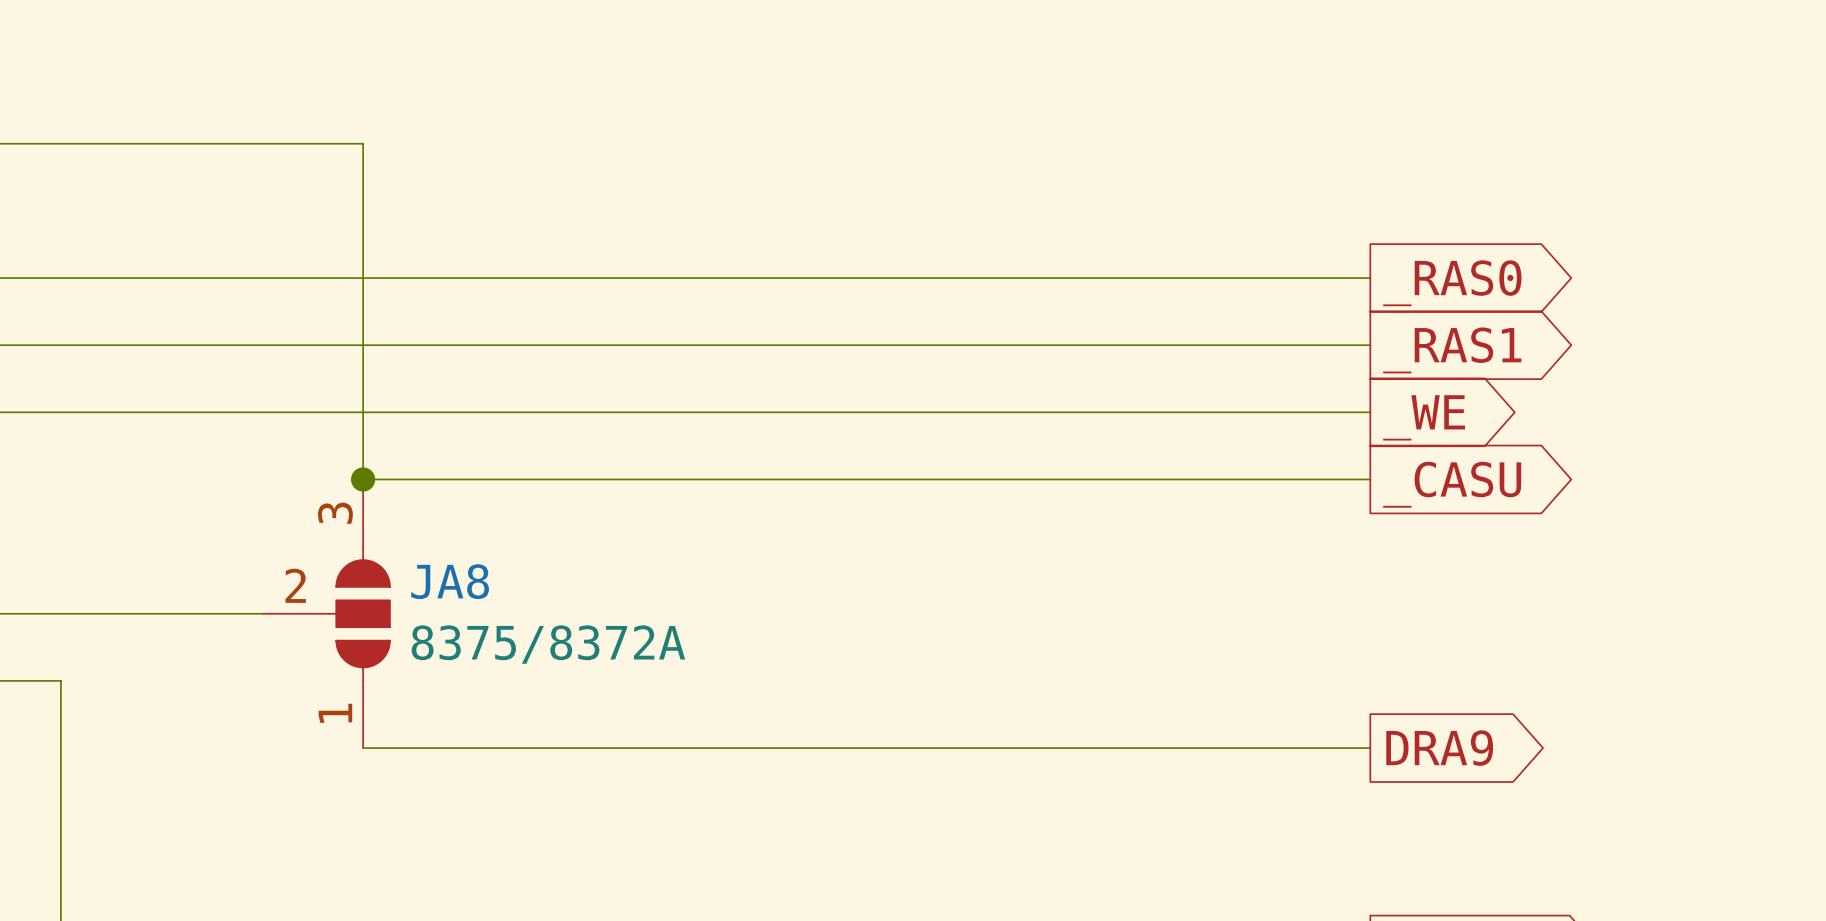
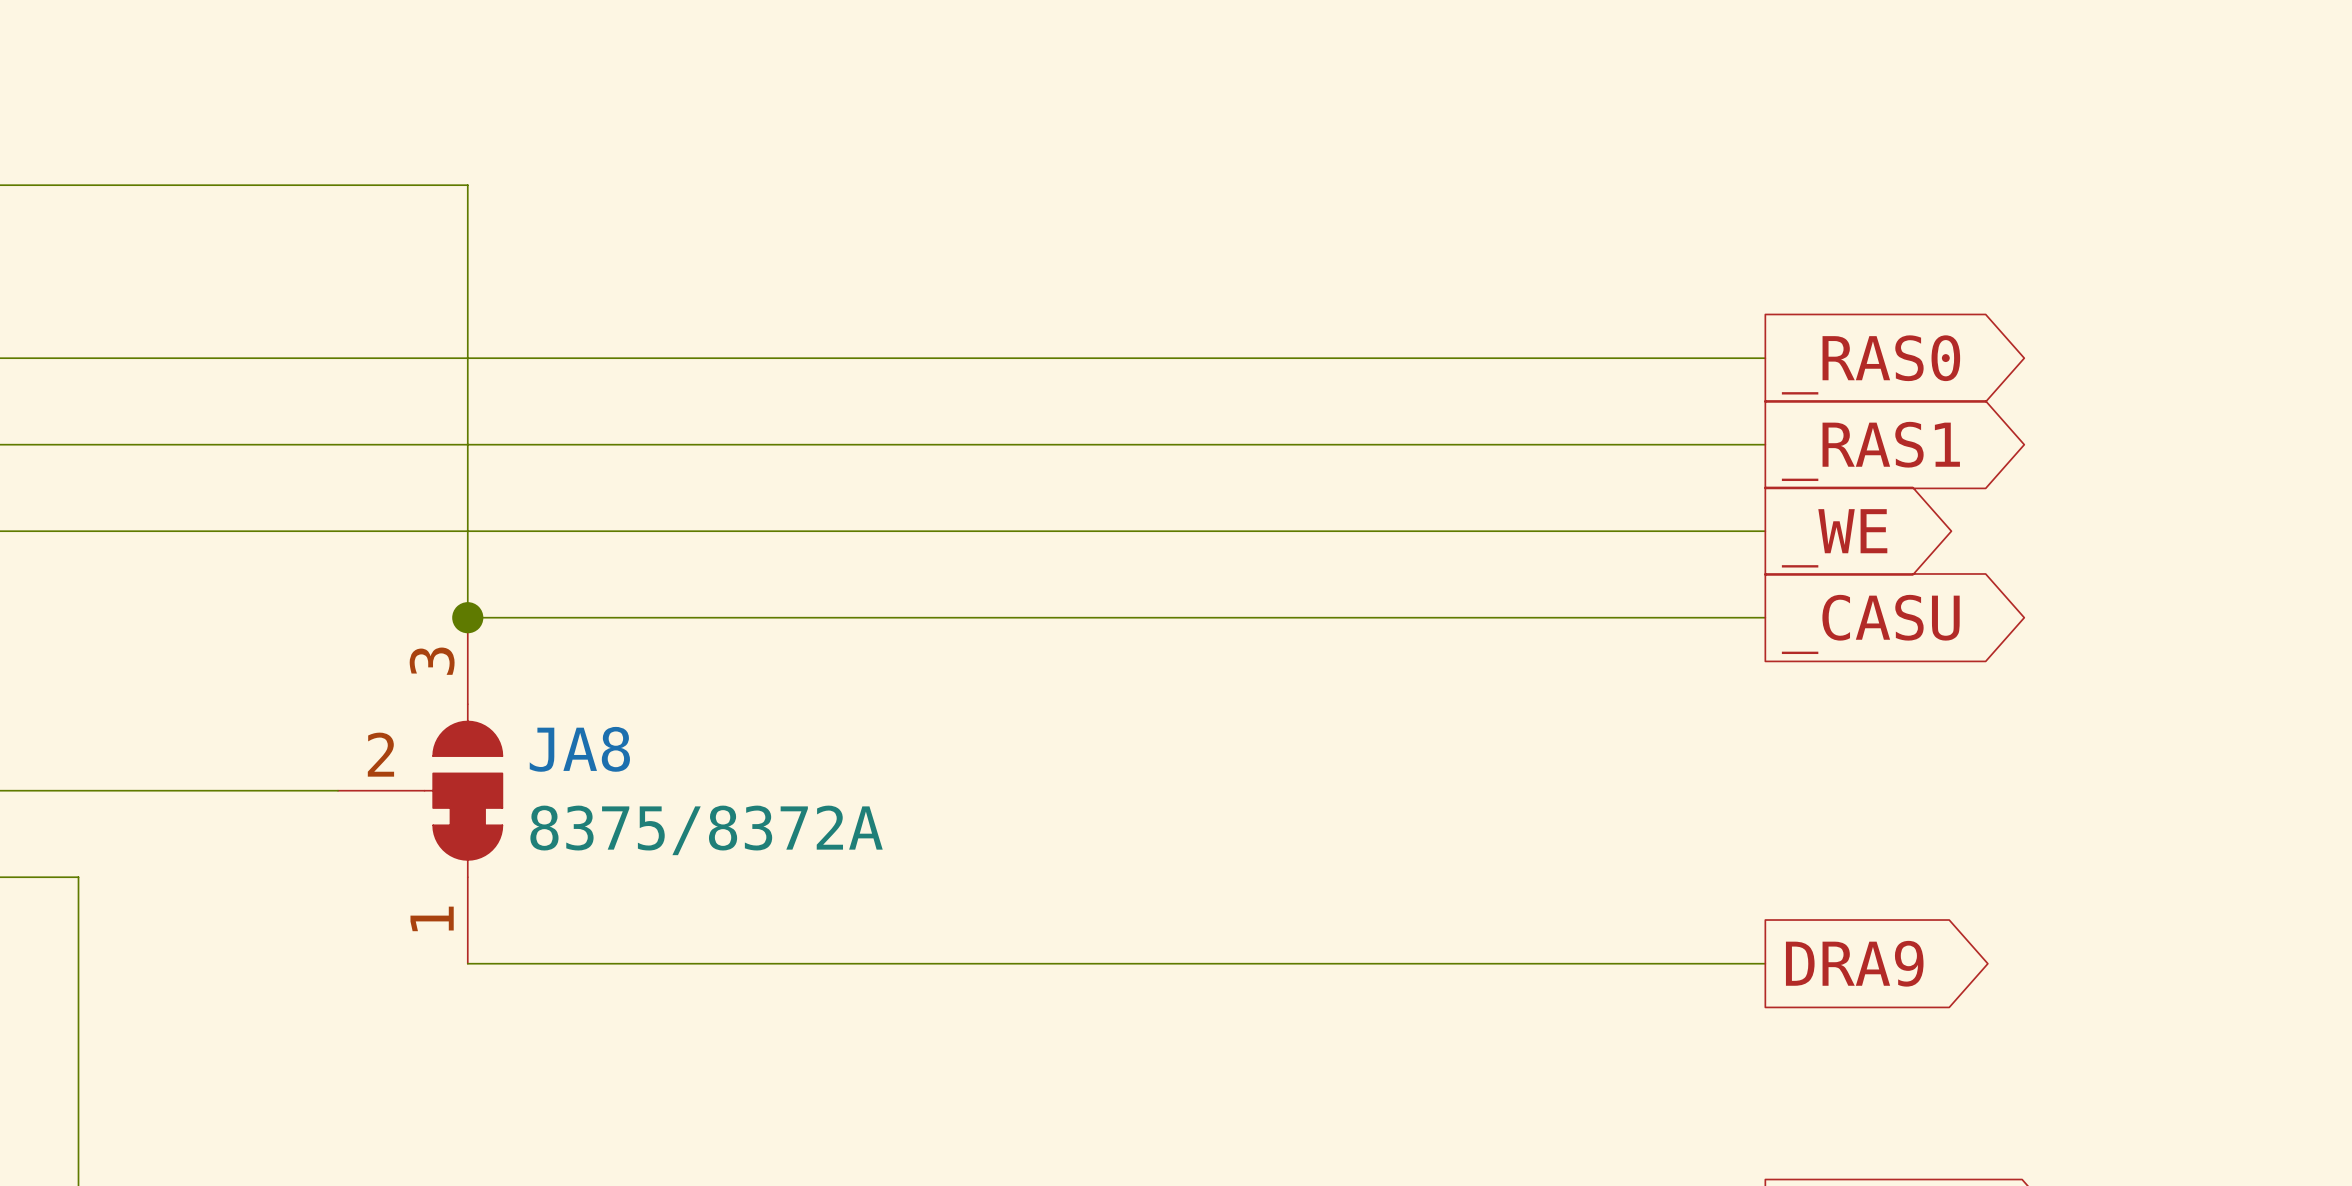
JA8 symbol: [262, 479, 390, 749] -> [338, 617, 503, 964]

